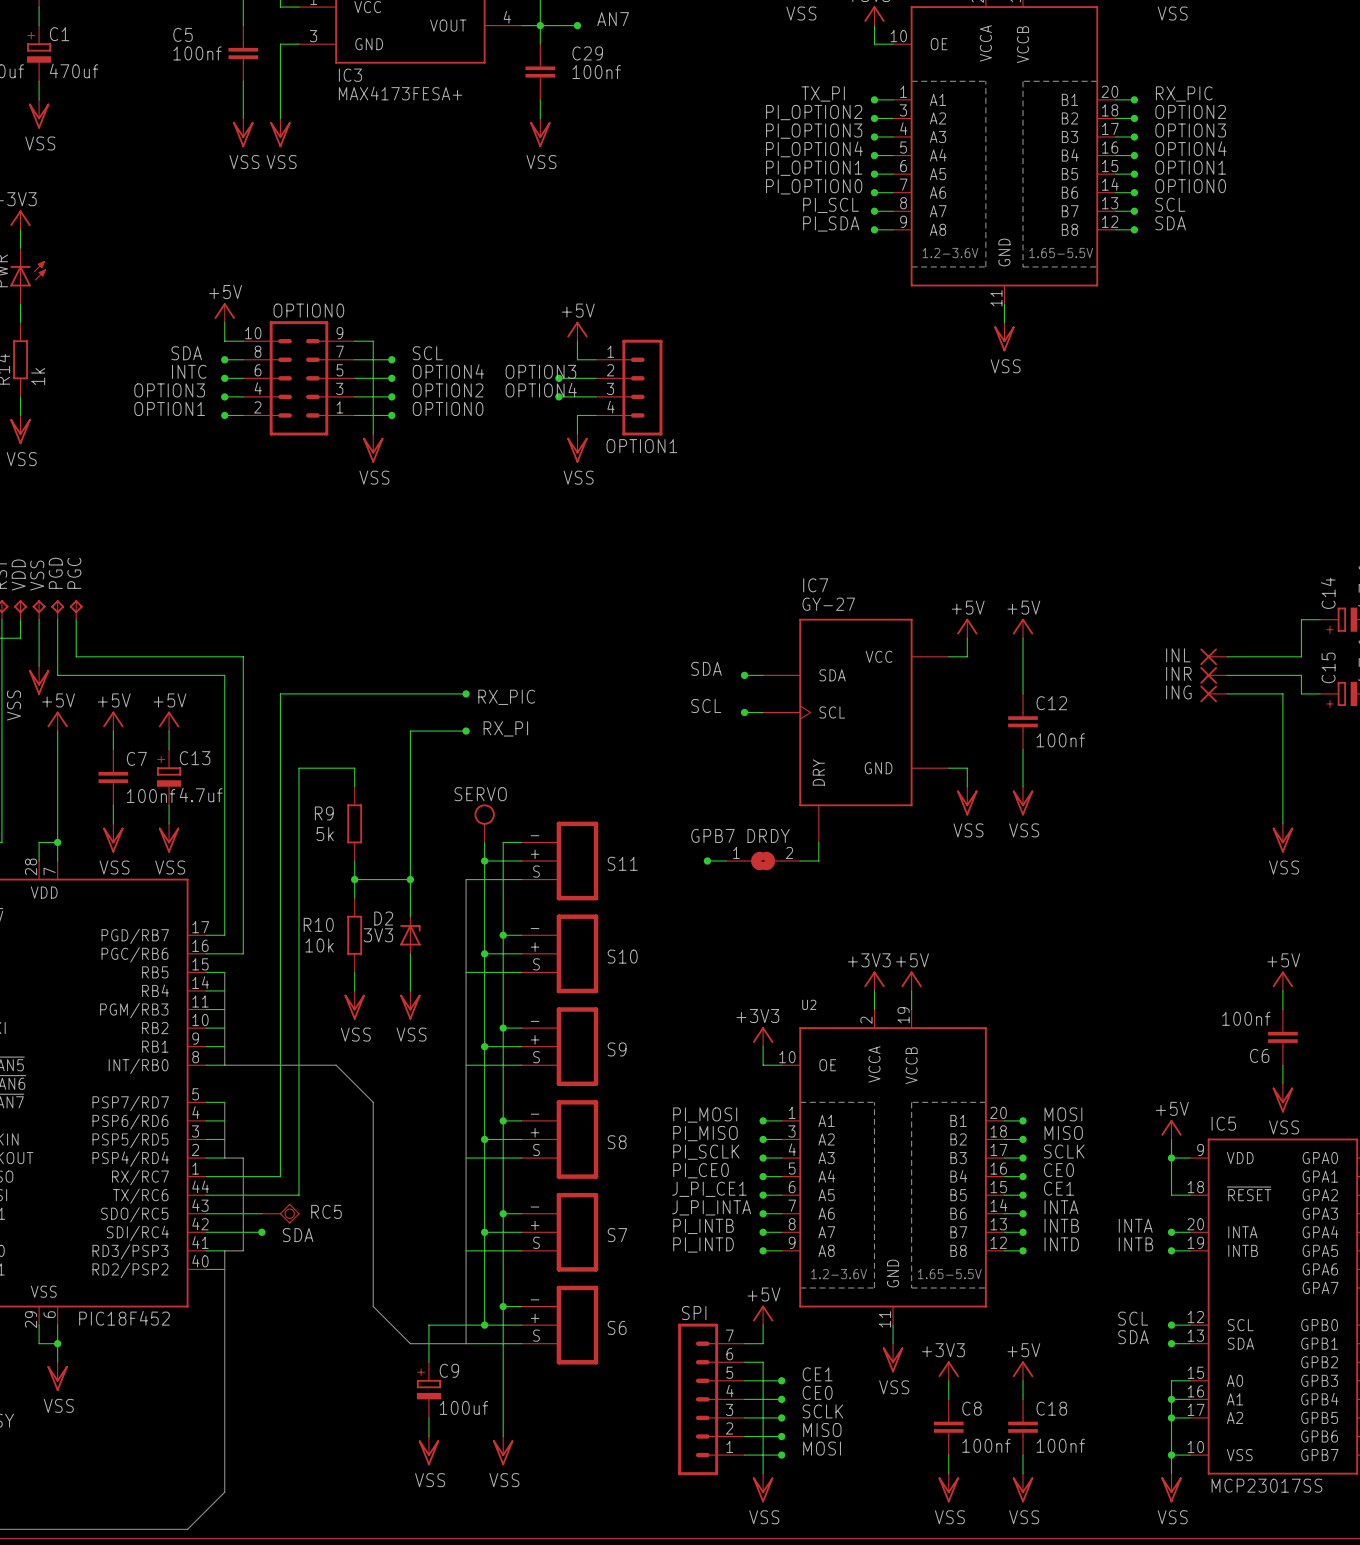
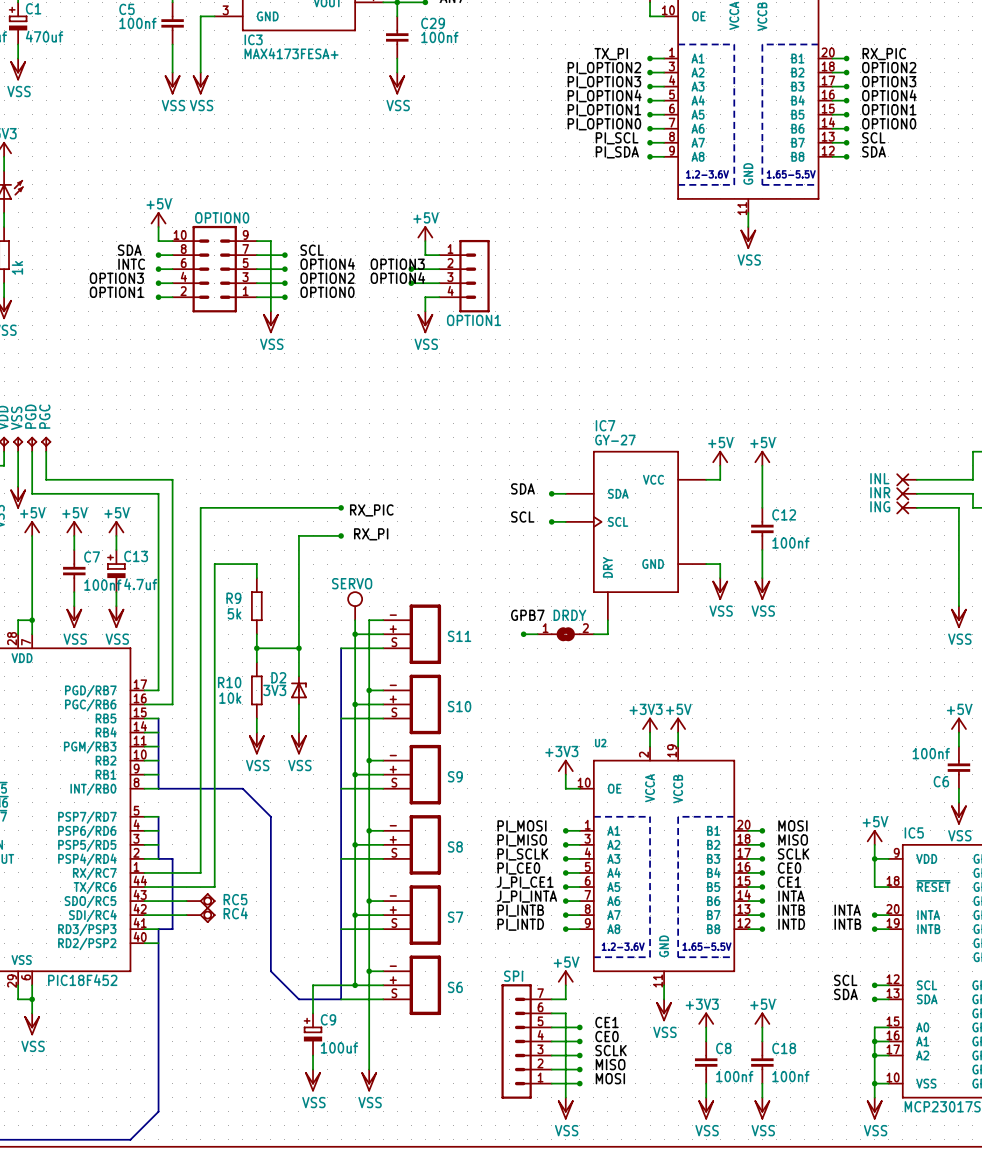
junction: (261, 1232) -> none
RC4: none -> (200, 915)
label: SDA (298, 1235) -> none

